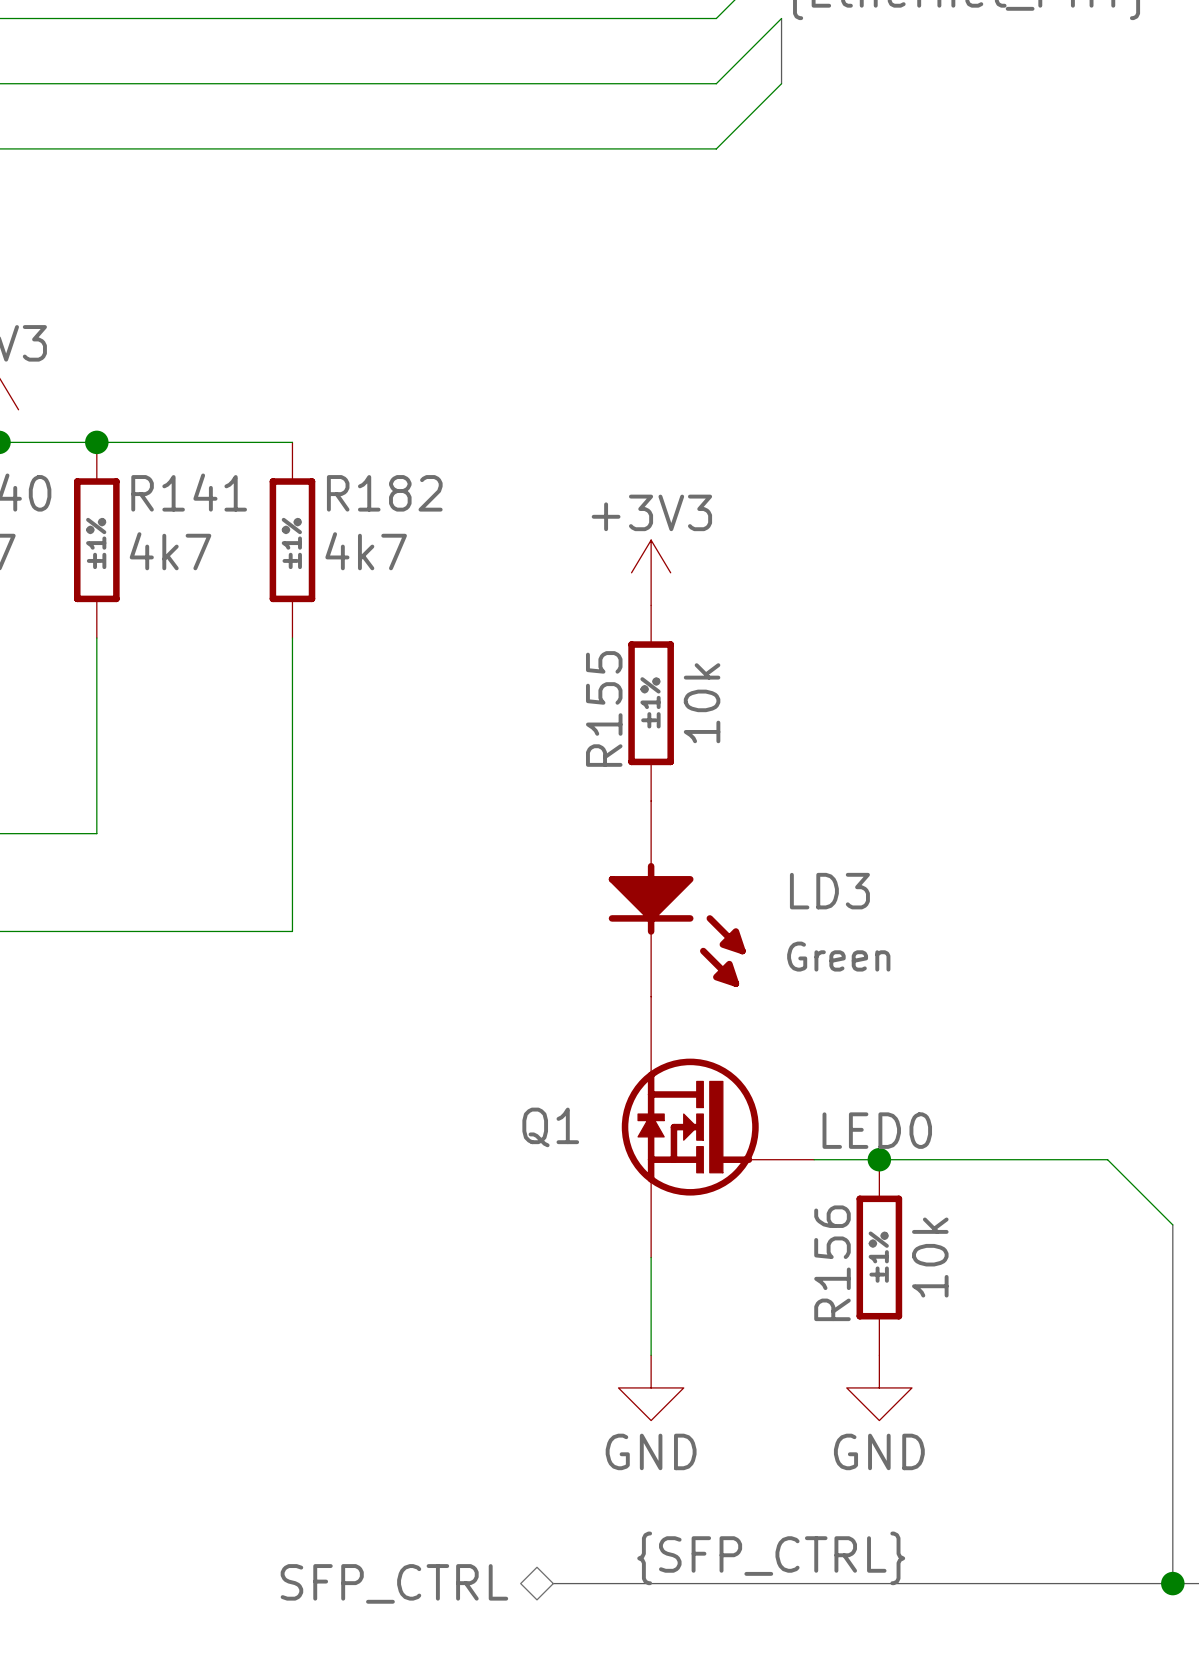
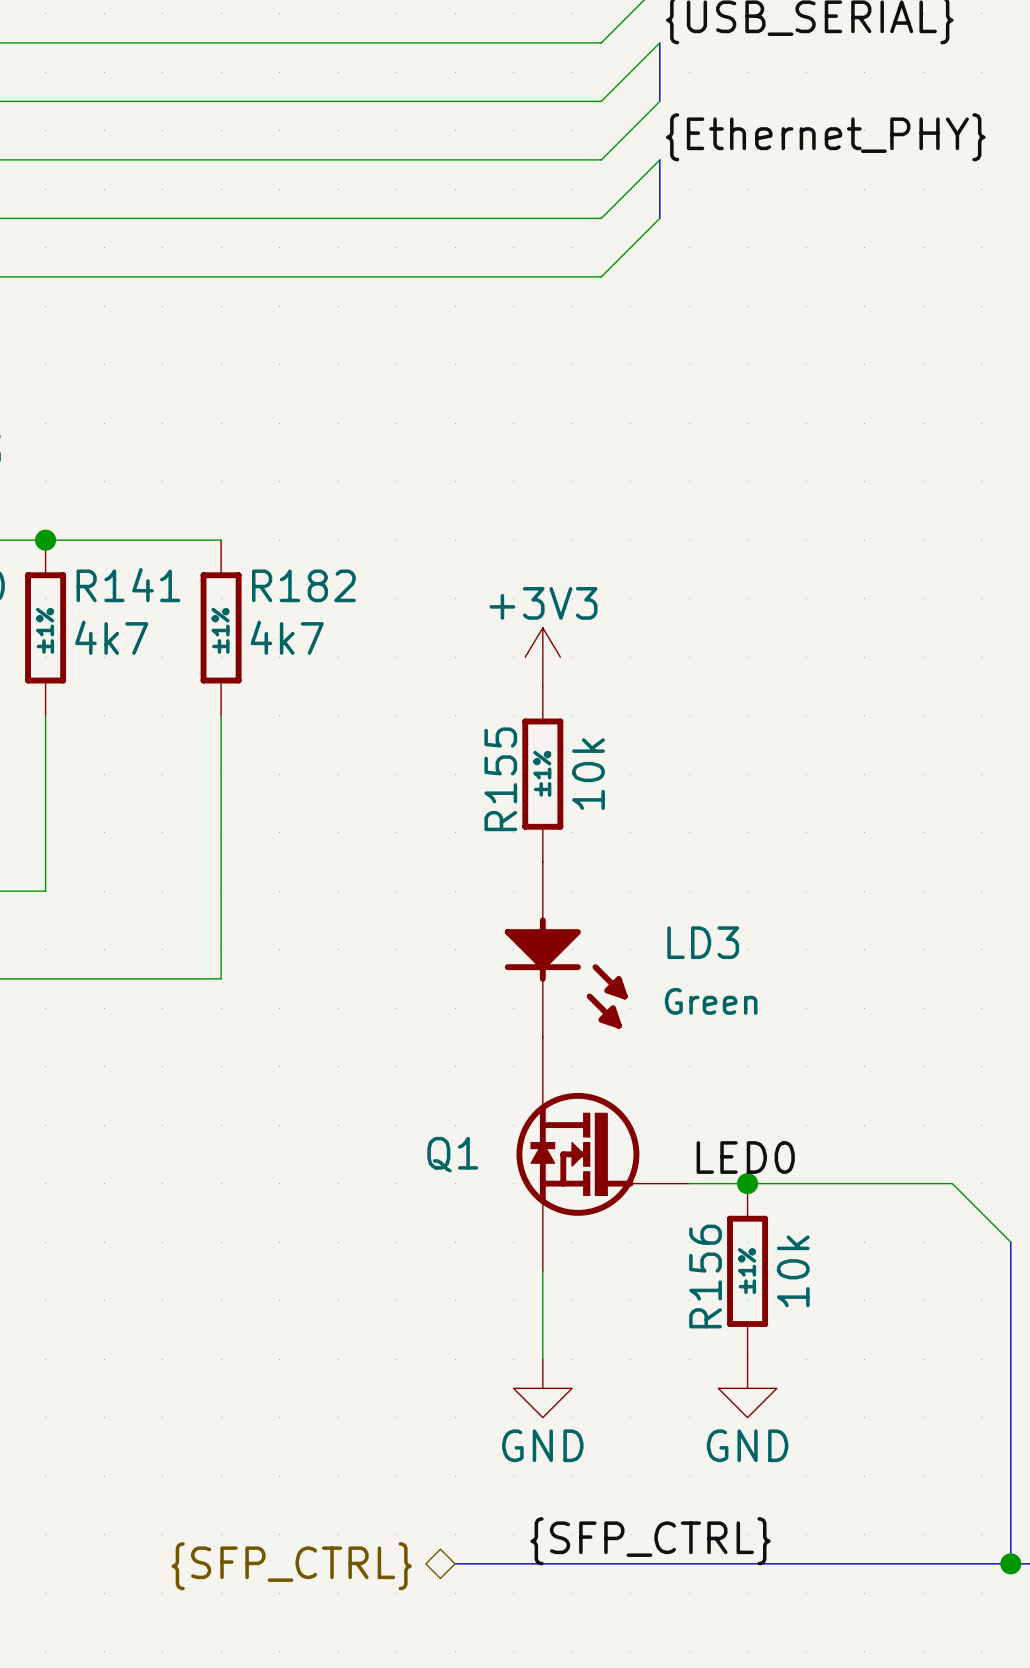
hierarchical label: SFP_CTRL (394, 1583) -> {SFP_CTRL} (291, 1566)

